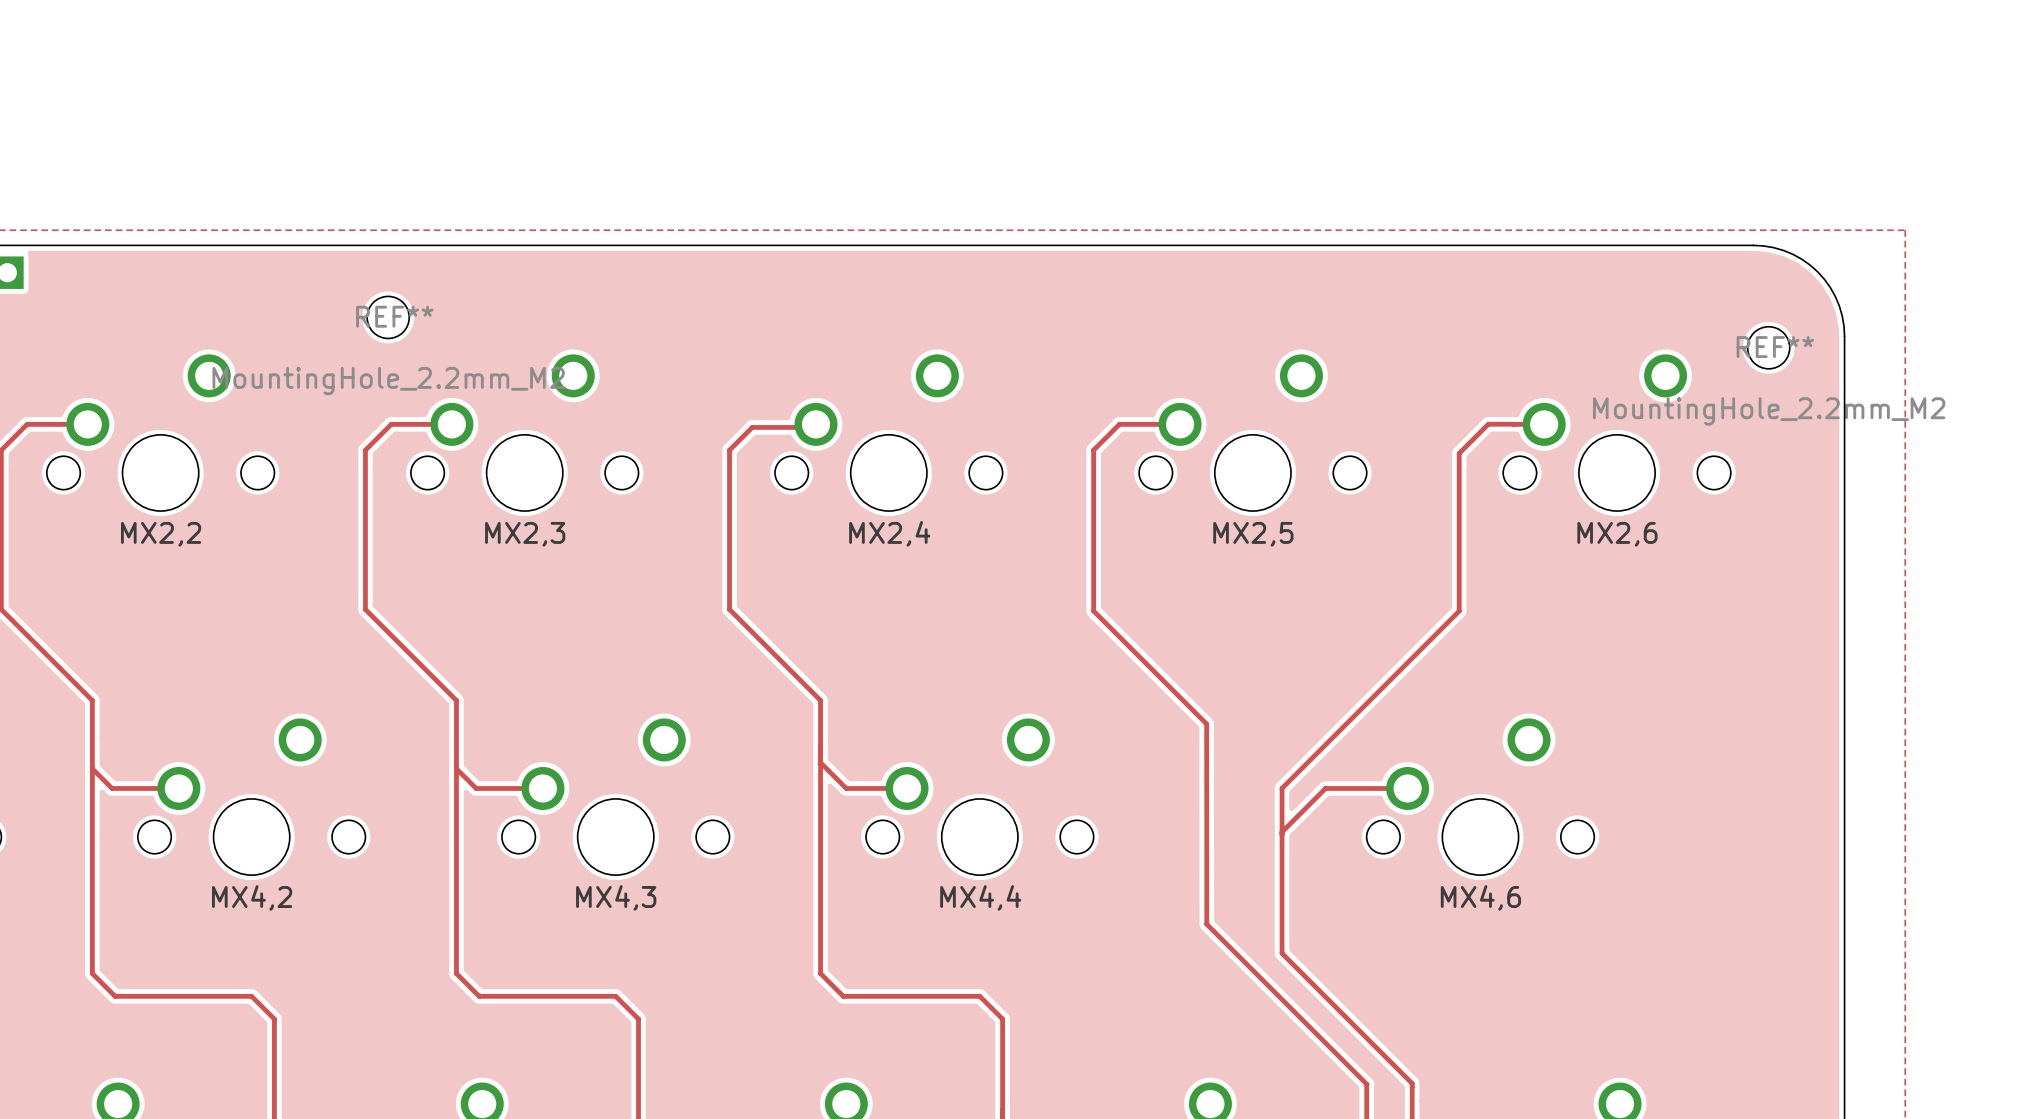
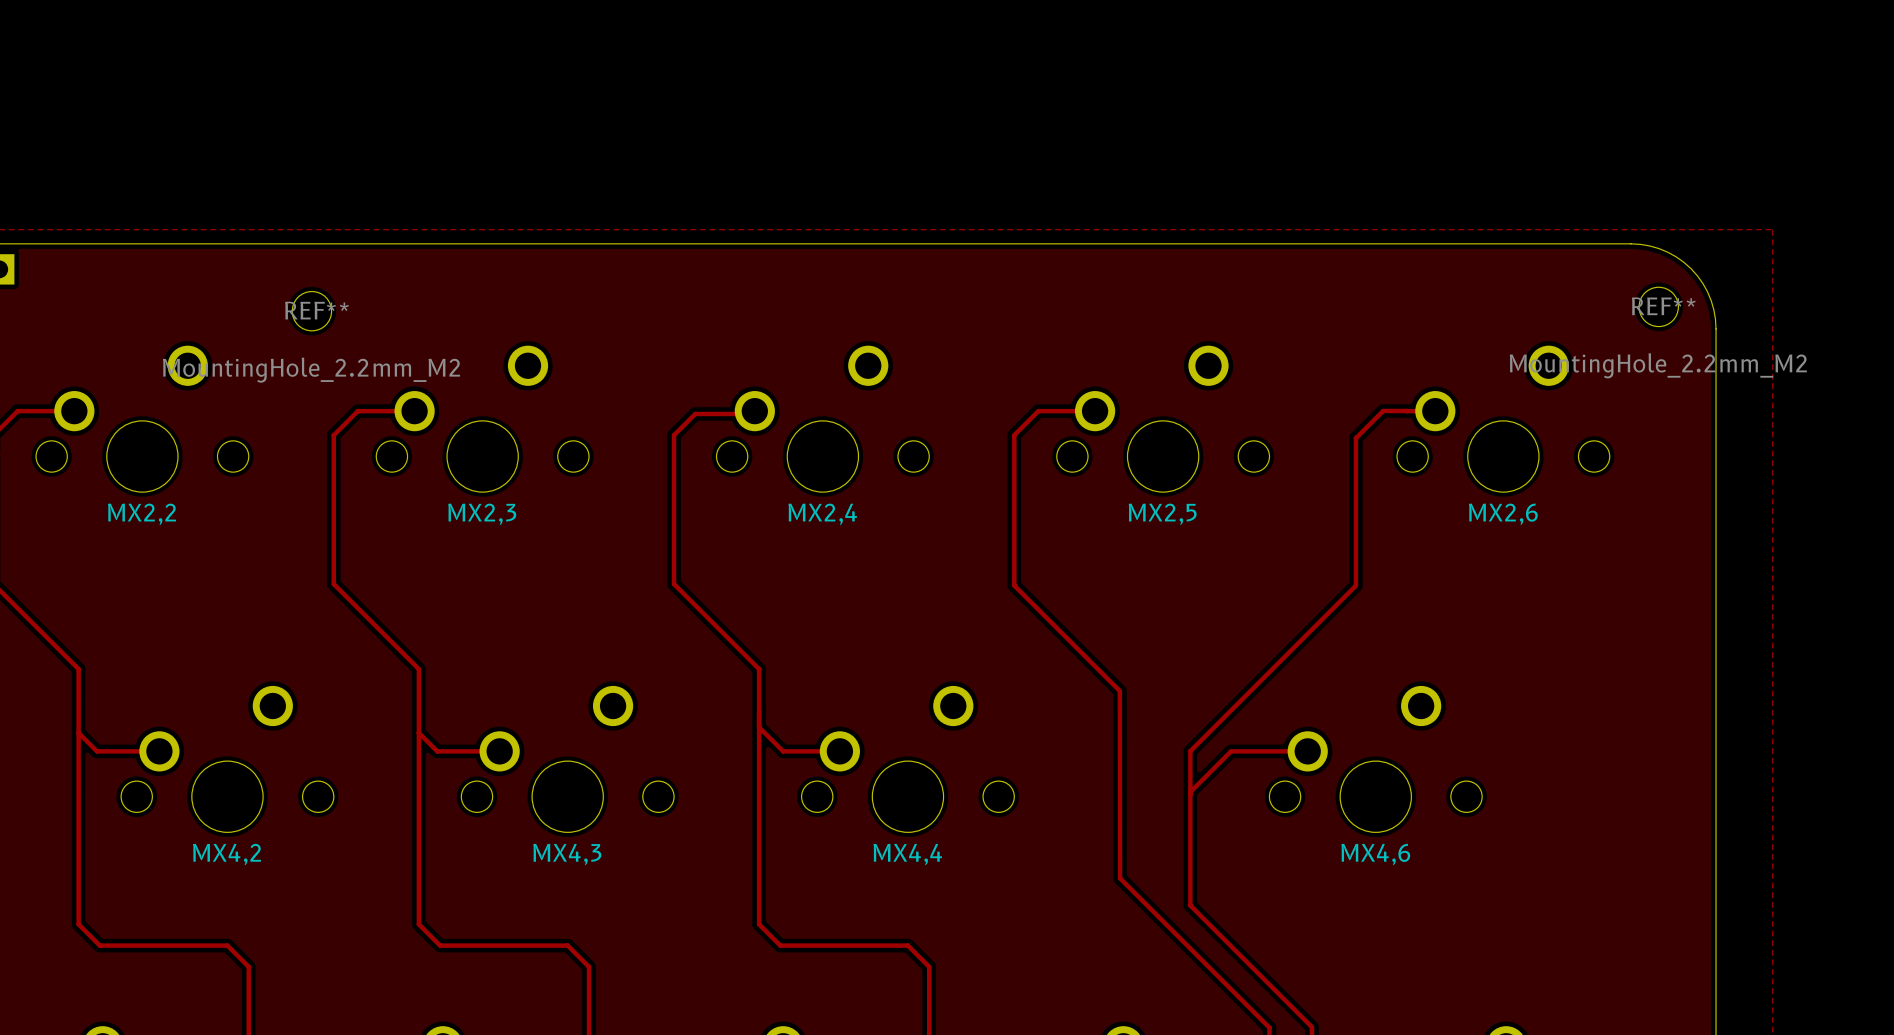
REF** position: (388, 317) -> (311, 311)
REF** position: (1768, 347) -> (1658, 306)

